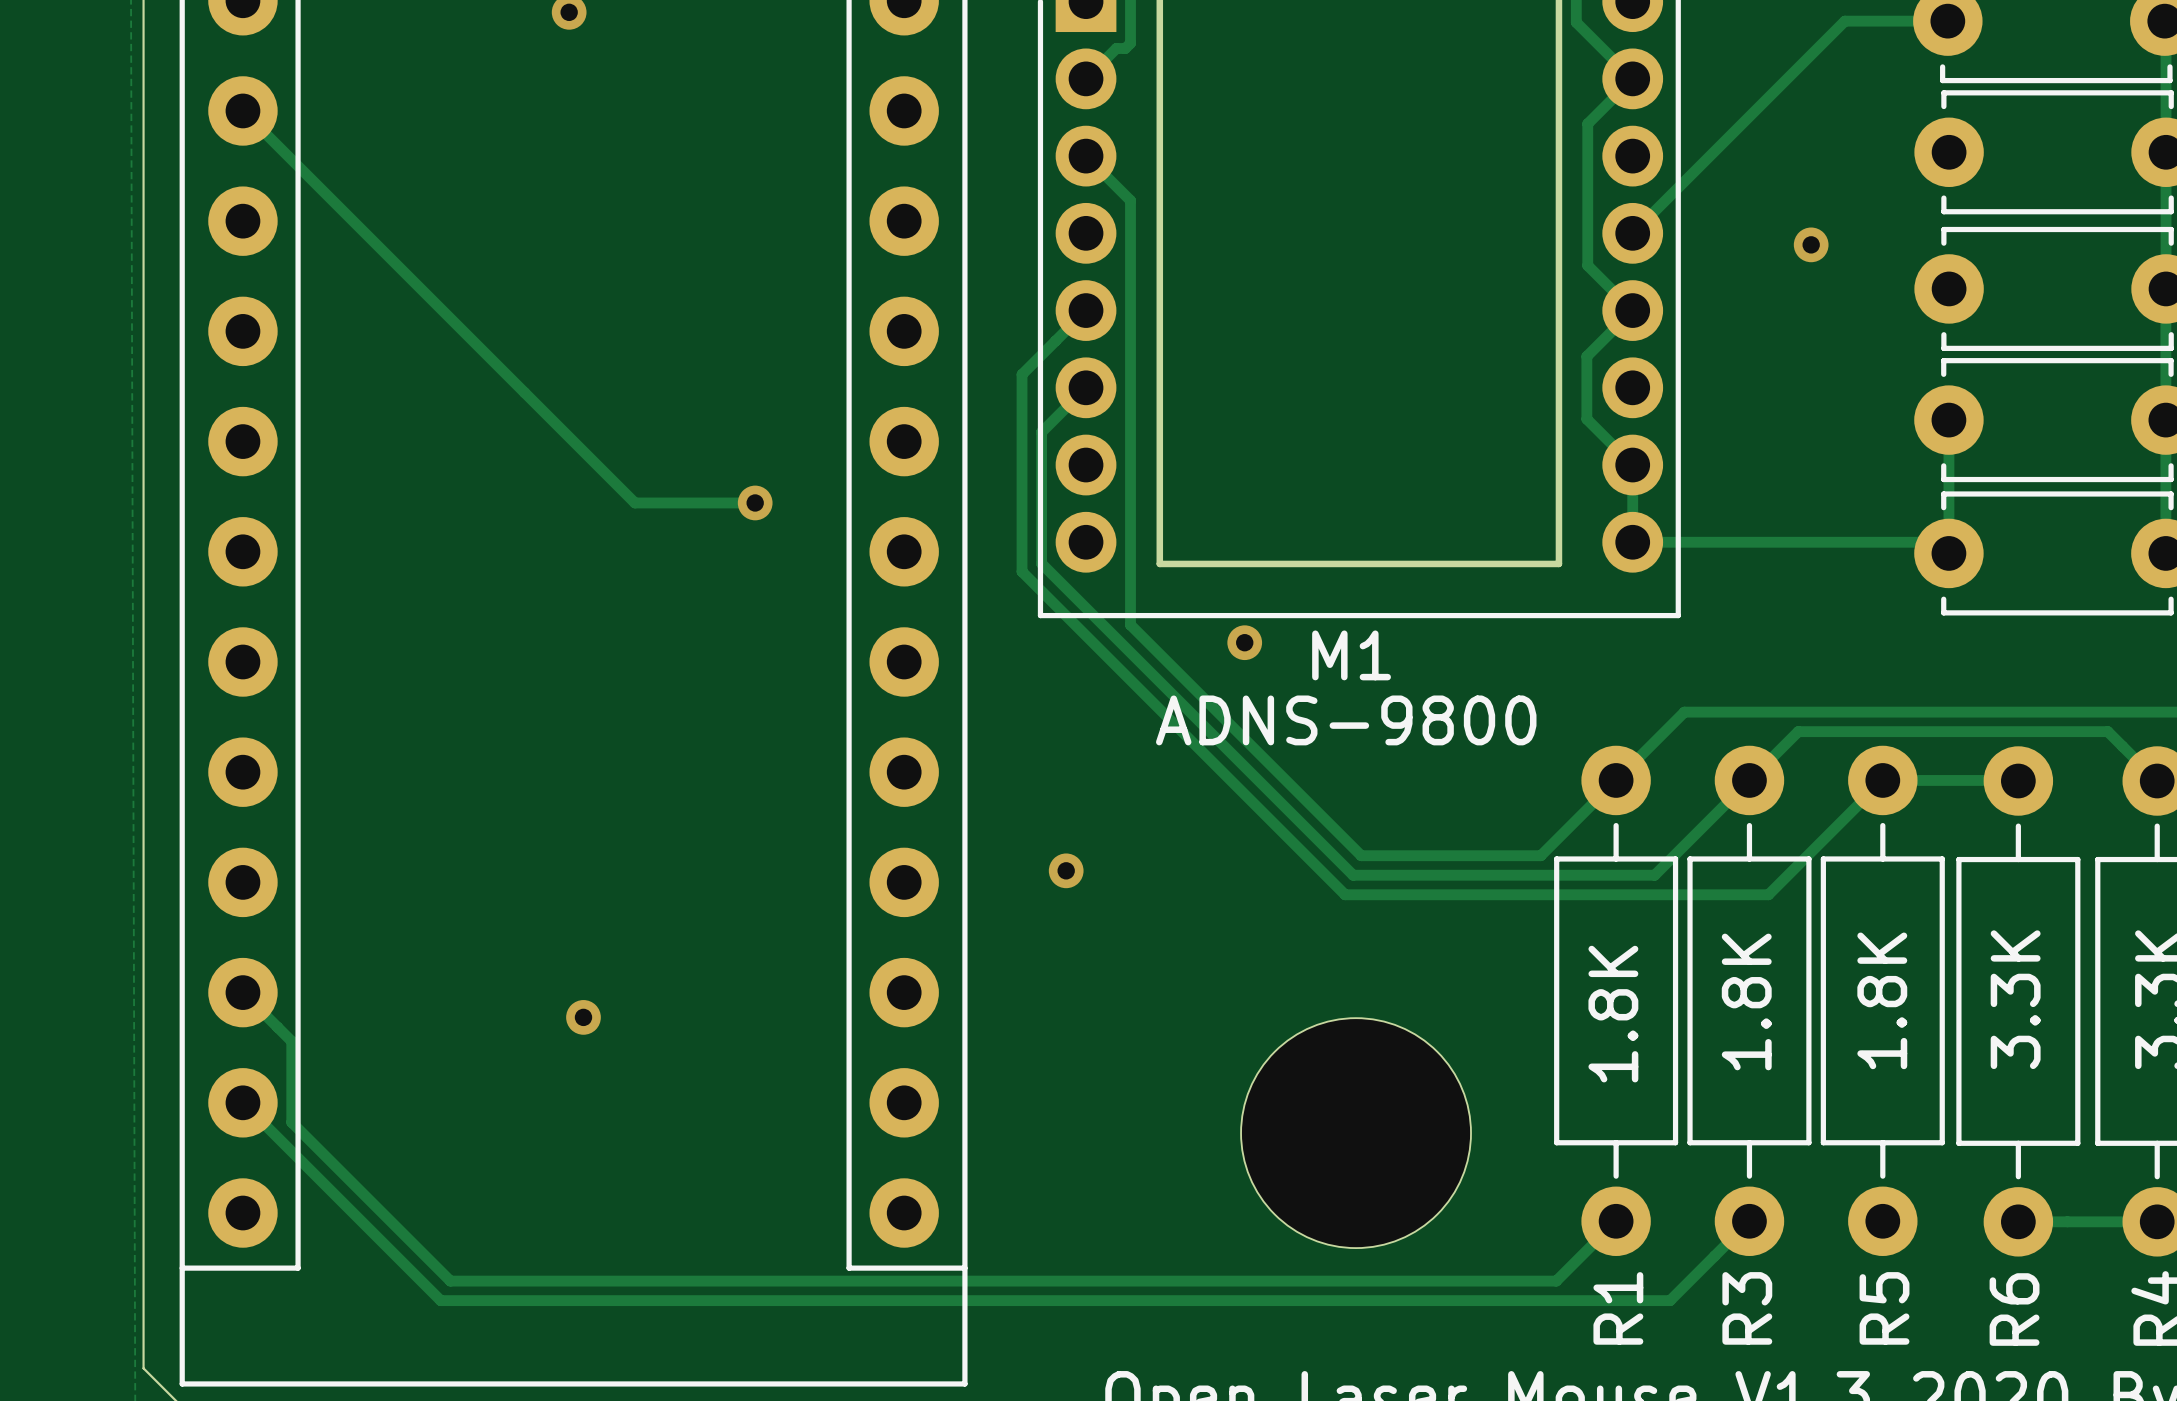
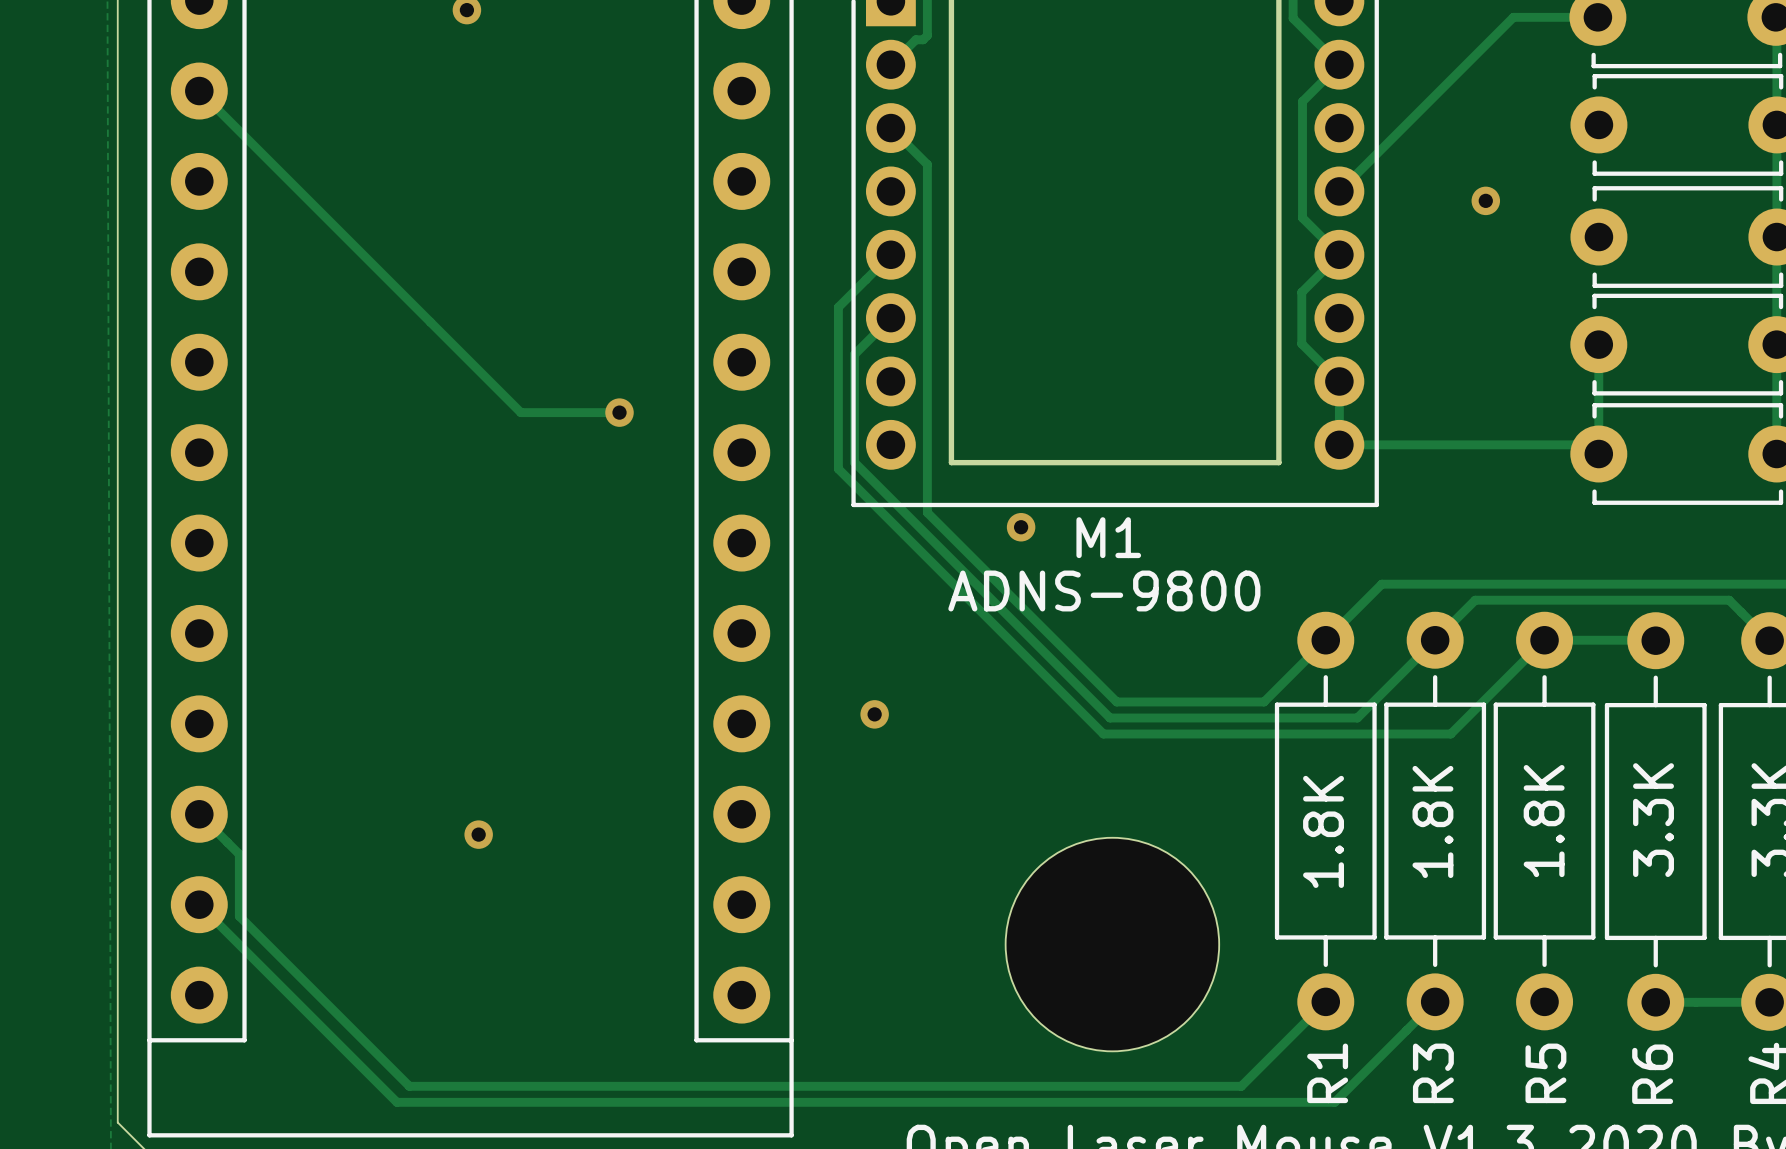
part footprint: [1241, 1018, 1472, 1249] -> [1005, 837, 1220, 1052]
track: (291, 1116) (291, 1122) (450, 1281) (1556, 1281) -> (239, 916) (409, 1086) (1241, 1086) (1276, 1050)
track: (440, 1300) (1670, 1300) -> (361, 1066) (396, 1102) (1334, 1102) (1370, 1066)

